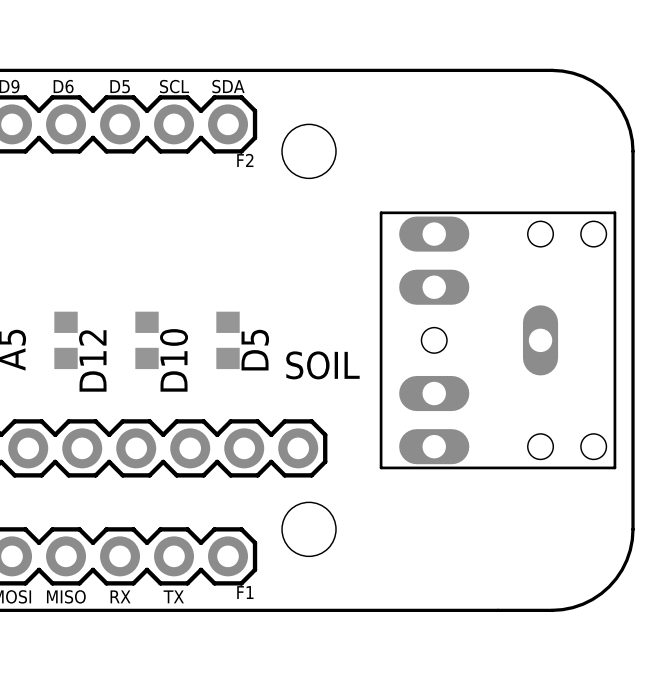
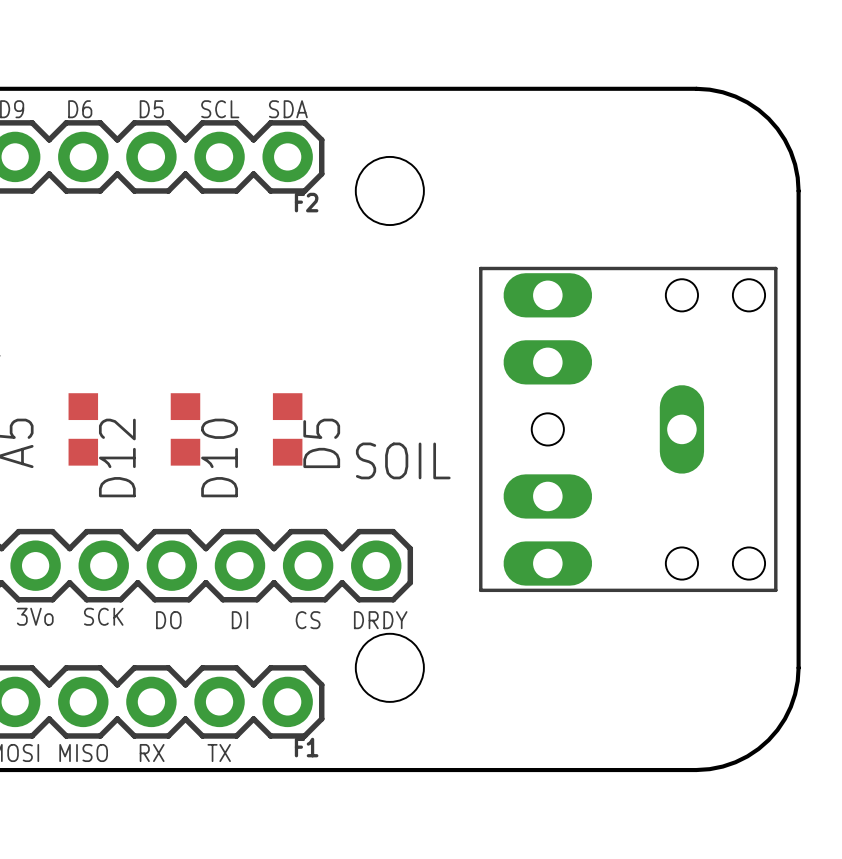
text: none -> 3Vo (35, 616)
text: none -> SCK (103, 616)
text: none -> DO (168, 620)
text: none -> DI (239, 620)
text: none -> CS (308, 620)
text: none -> DRDY (380, 620)

